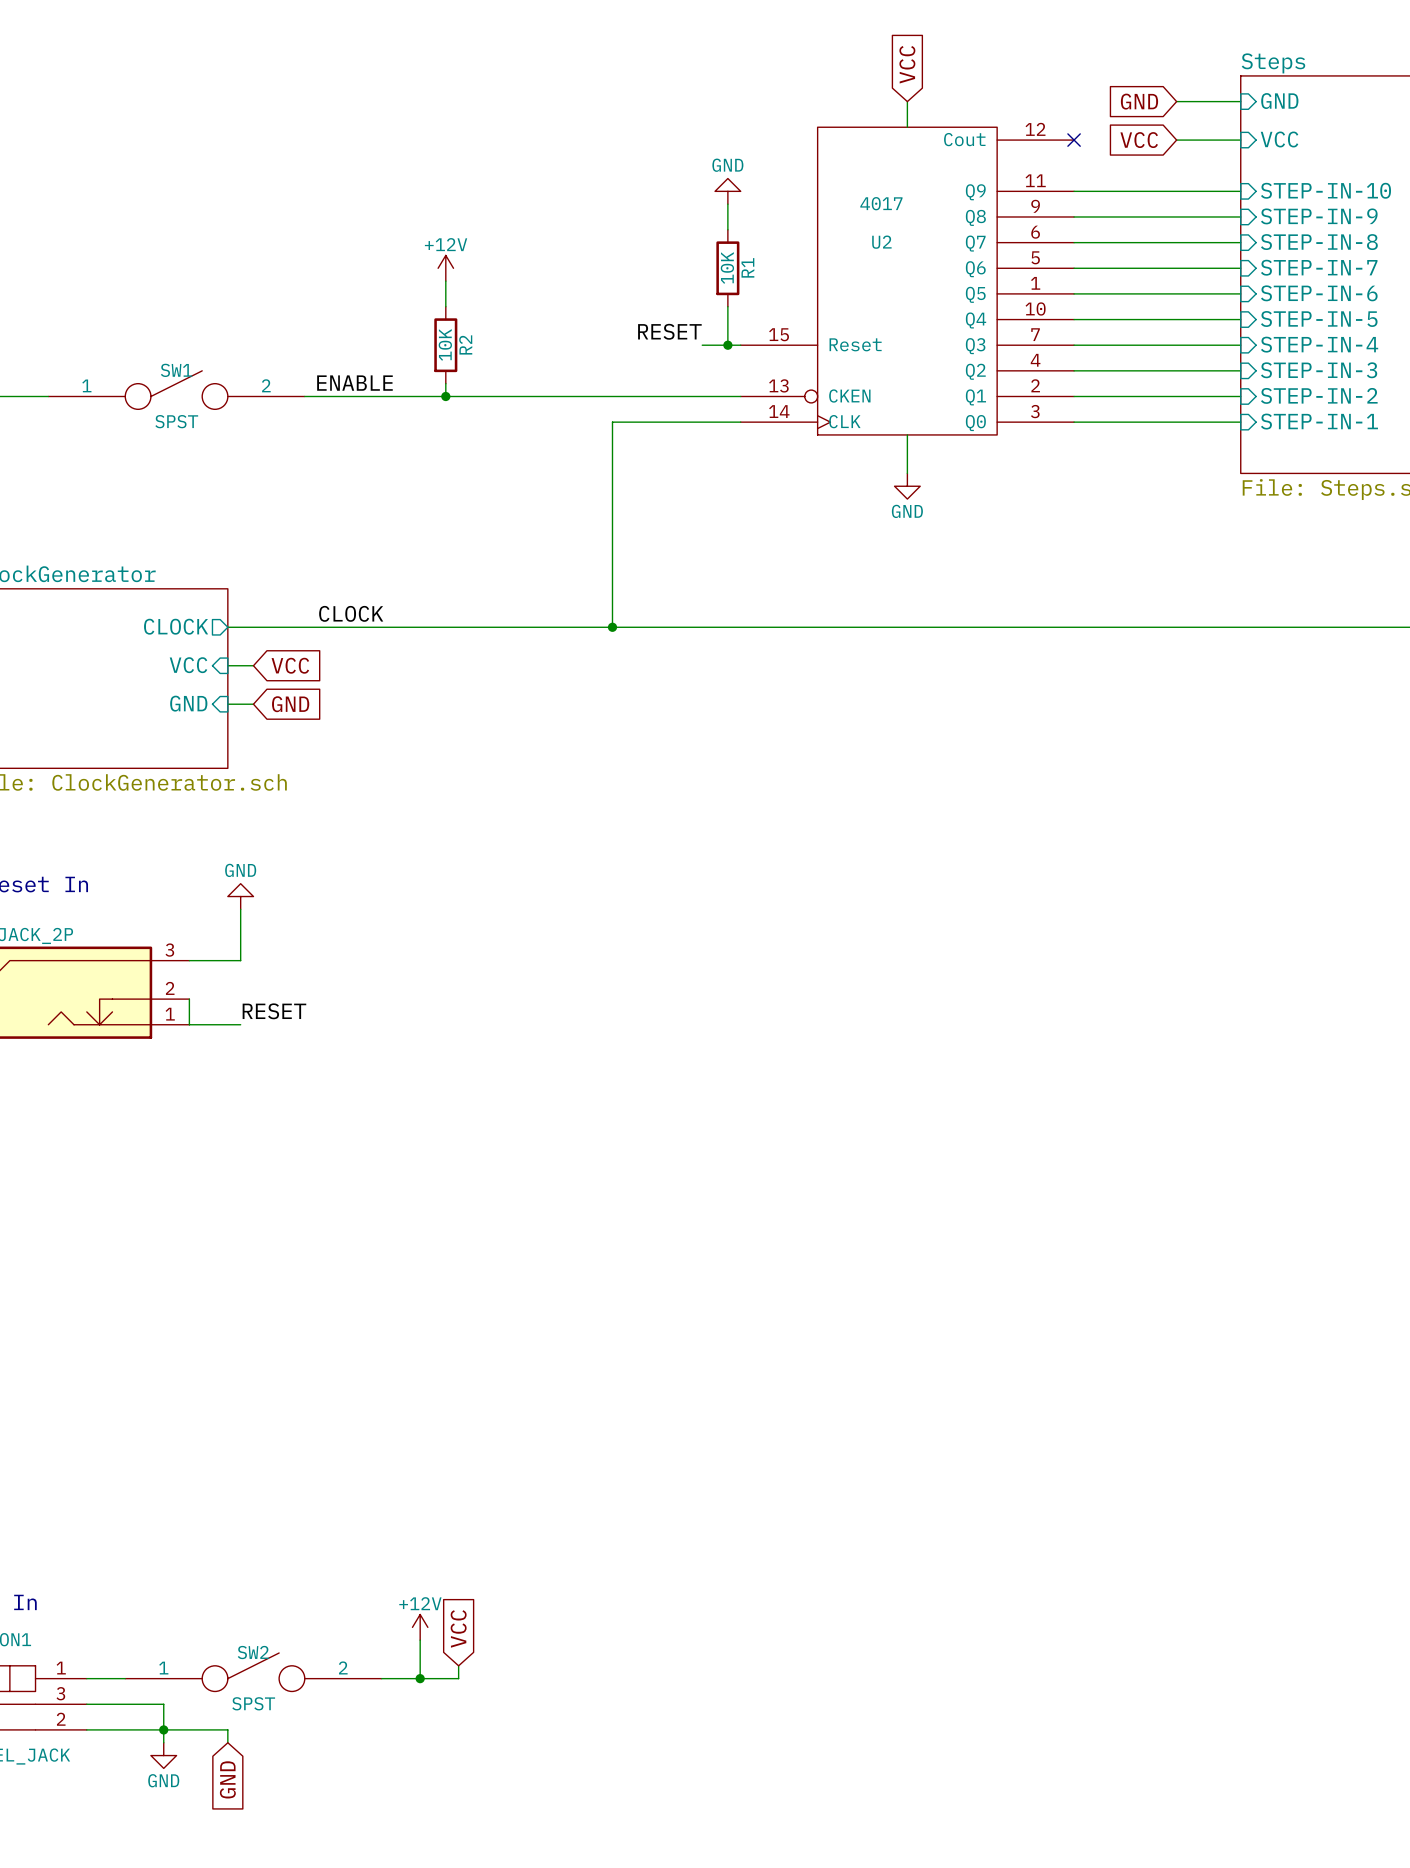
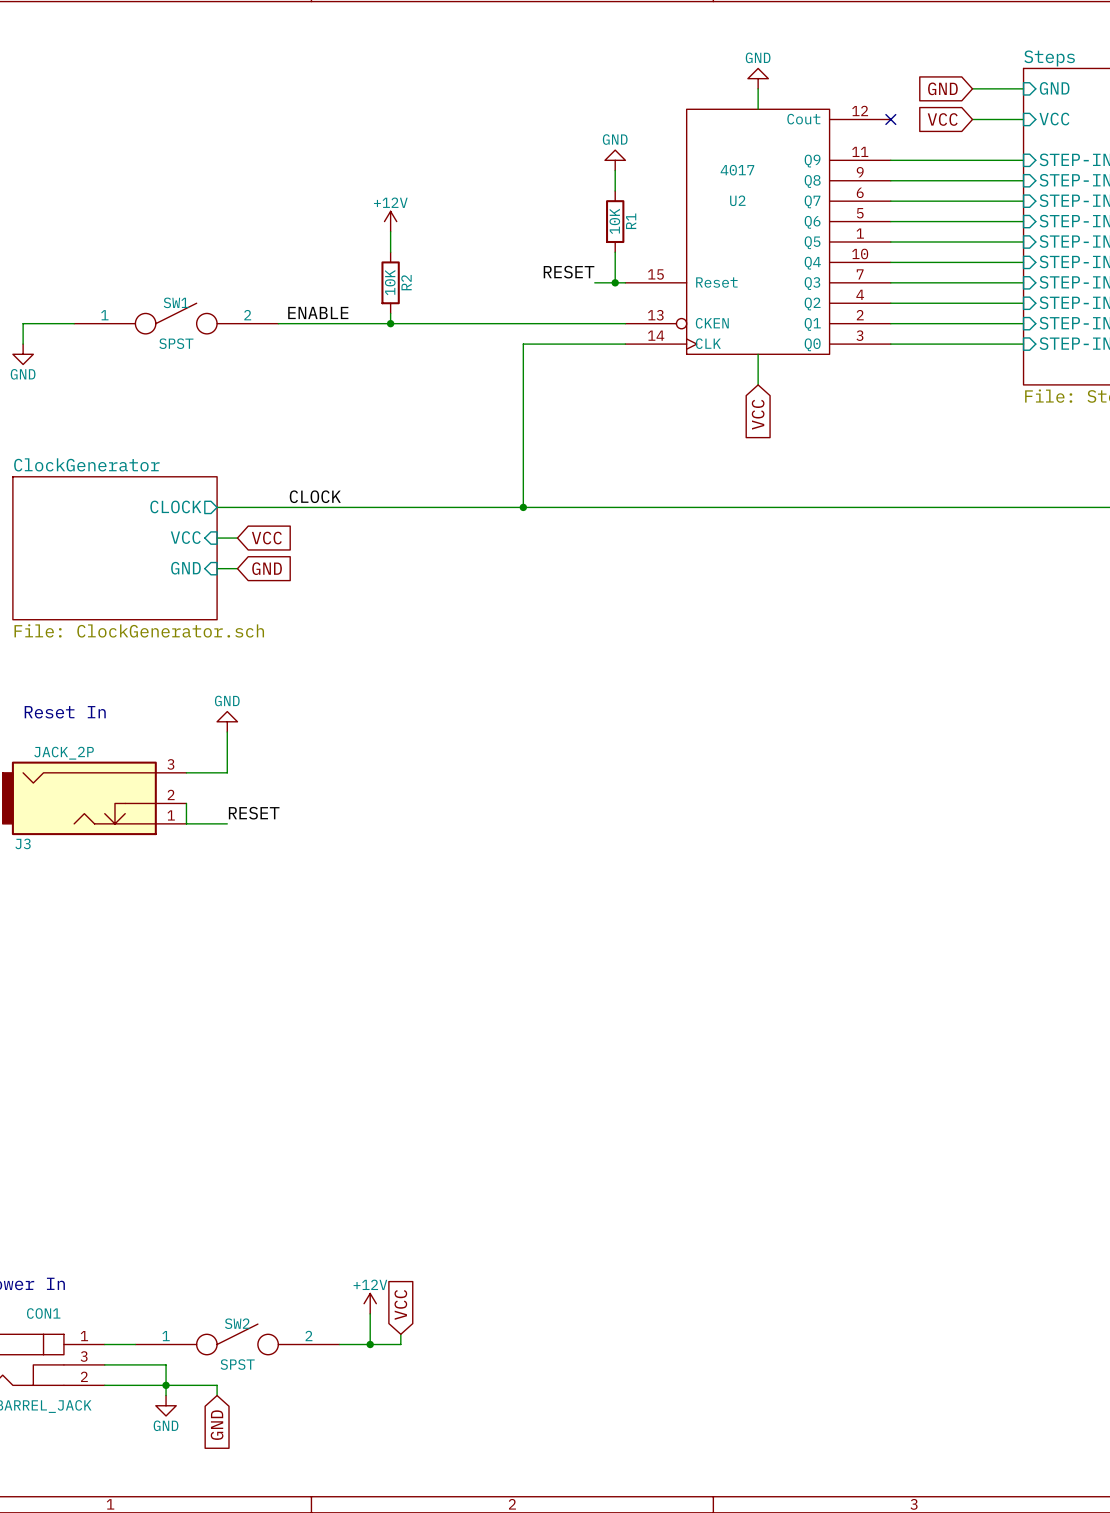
global label: VCC (907, 64) -> none
power symbol: none -> GND (758, 78)
power symbol: GND (907, 486) -> none
global label: none -> VCC (758, 414)

